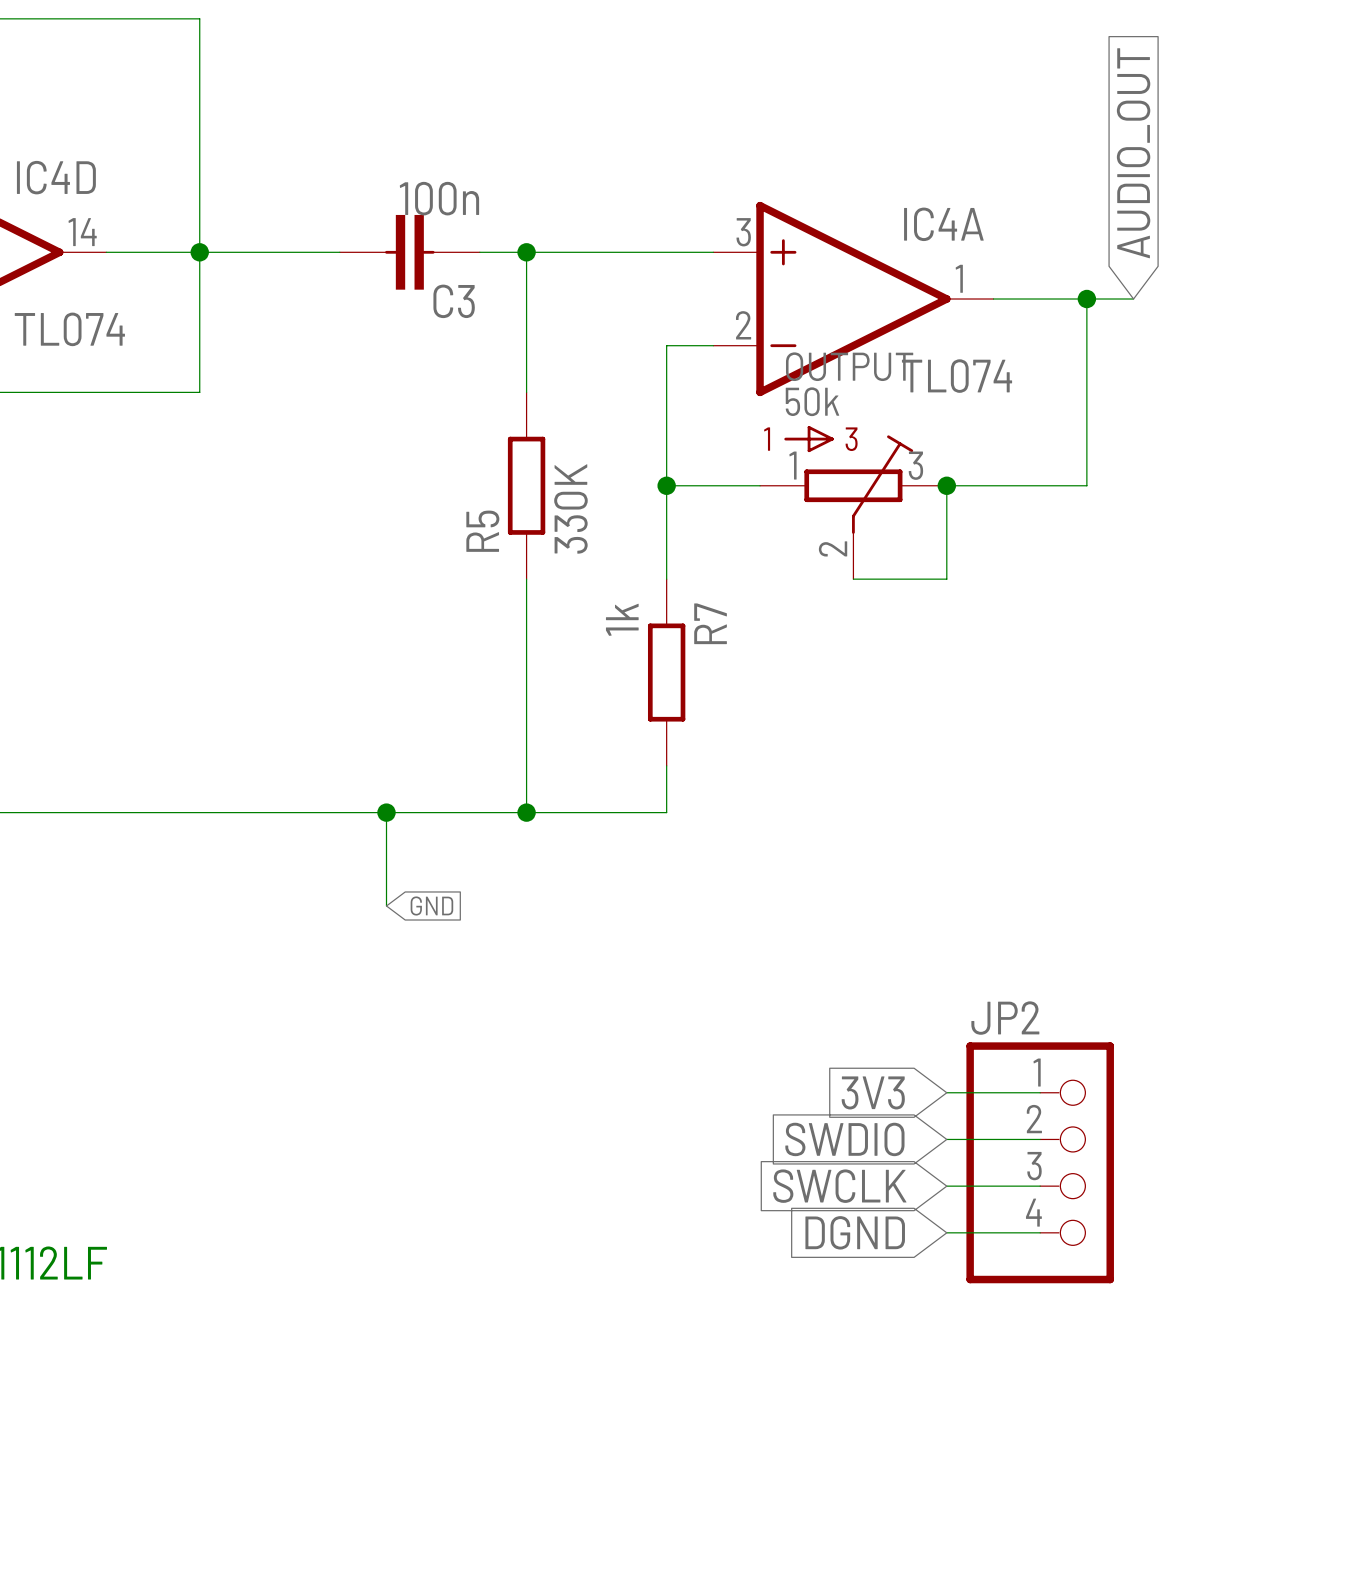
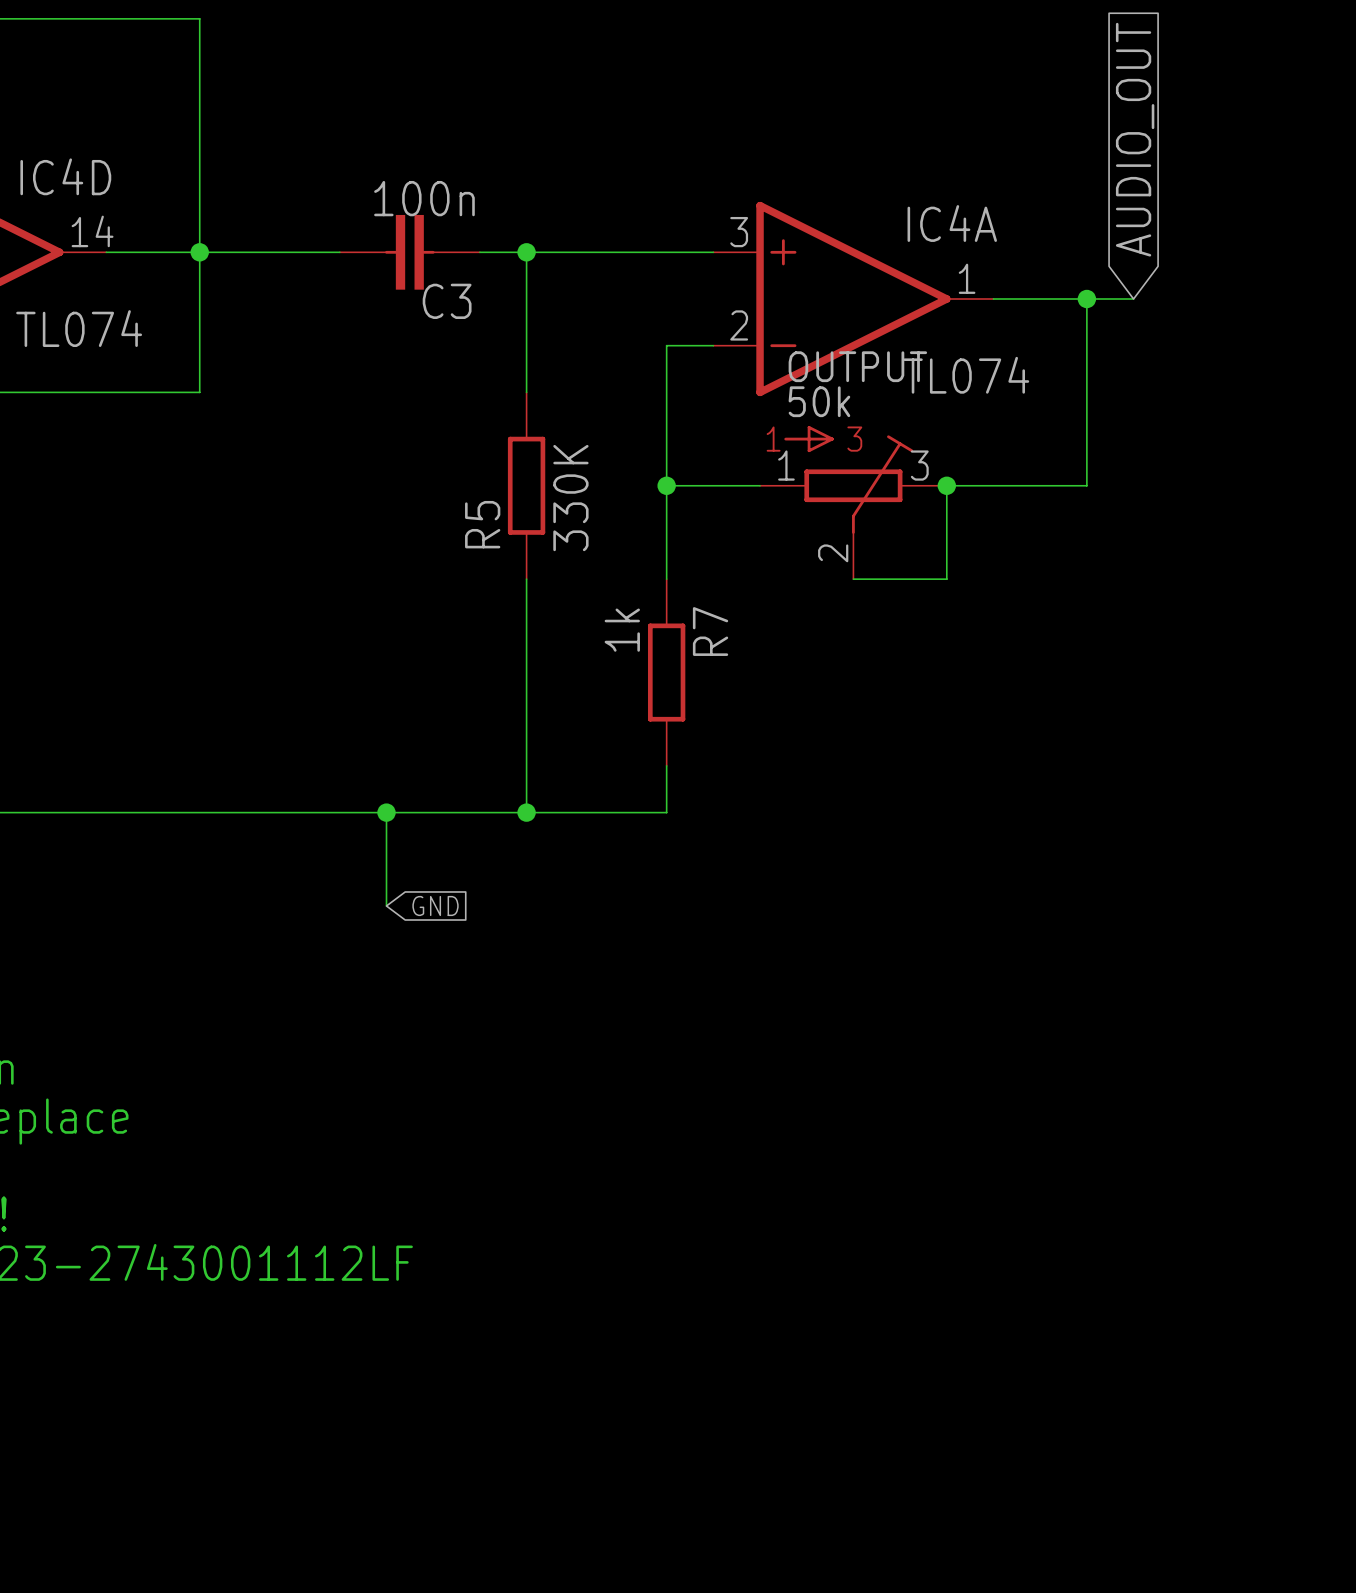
global label: 3V3 (873, 1092) -> none
wire: (946, 1092) (1040, 1092) -> none
global label: SWDIO (844, 1139) -> none
wire: (946, 1139) (1040, 1139) -> none
JP2: (1040, 1162) -> none
global label: SWCLK (839, 1186) -> none
wire: (946, 1186) (1040, 1186) -> none
global label: DGND (855, 1232) -> none
wire: (946, 1232) (1040, 1232) -> none

